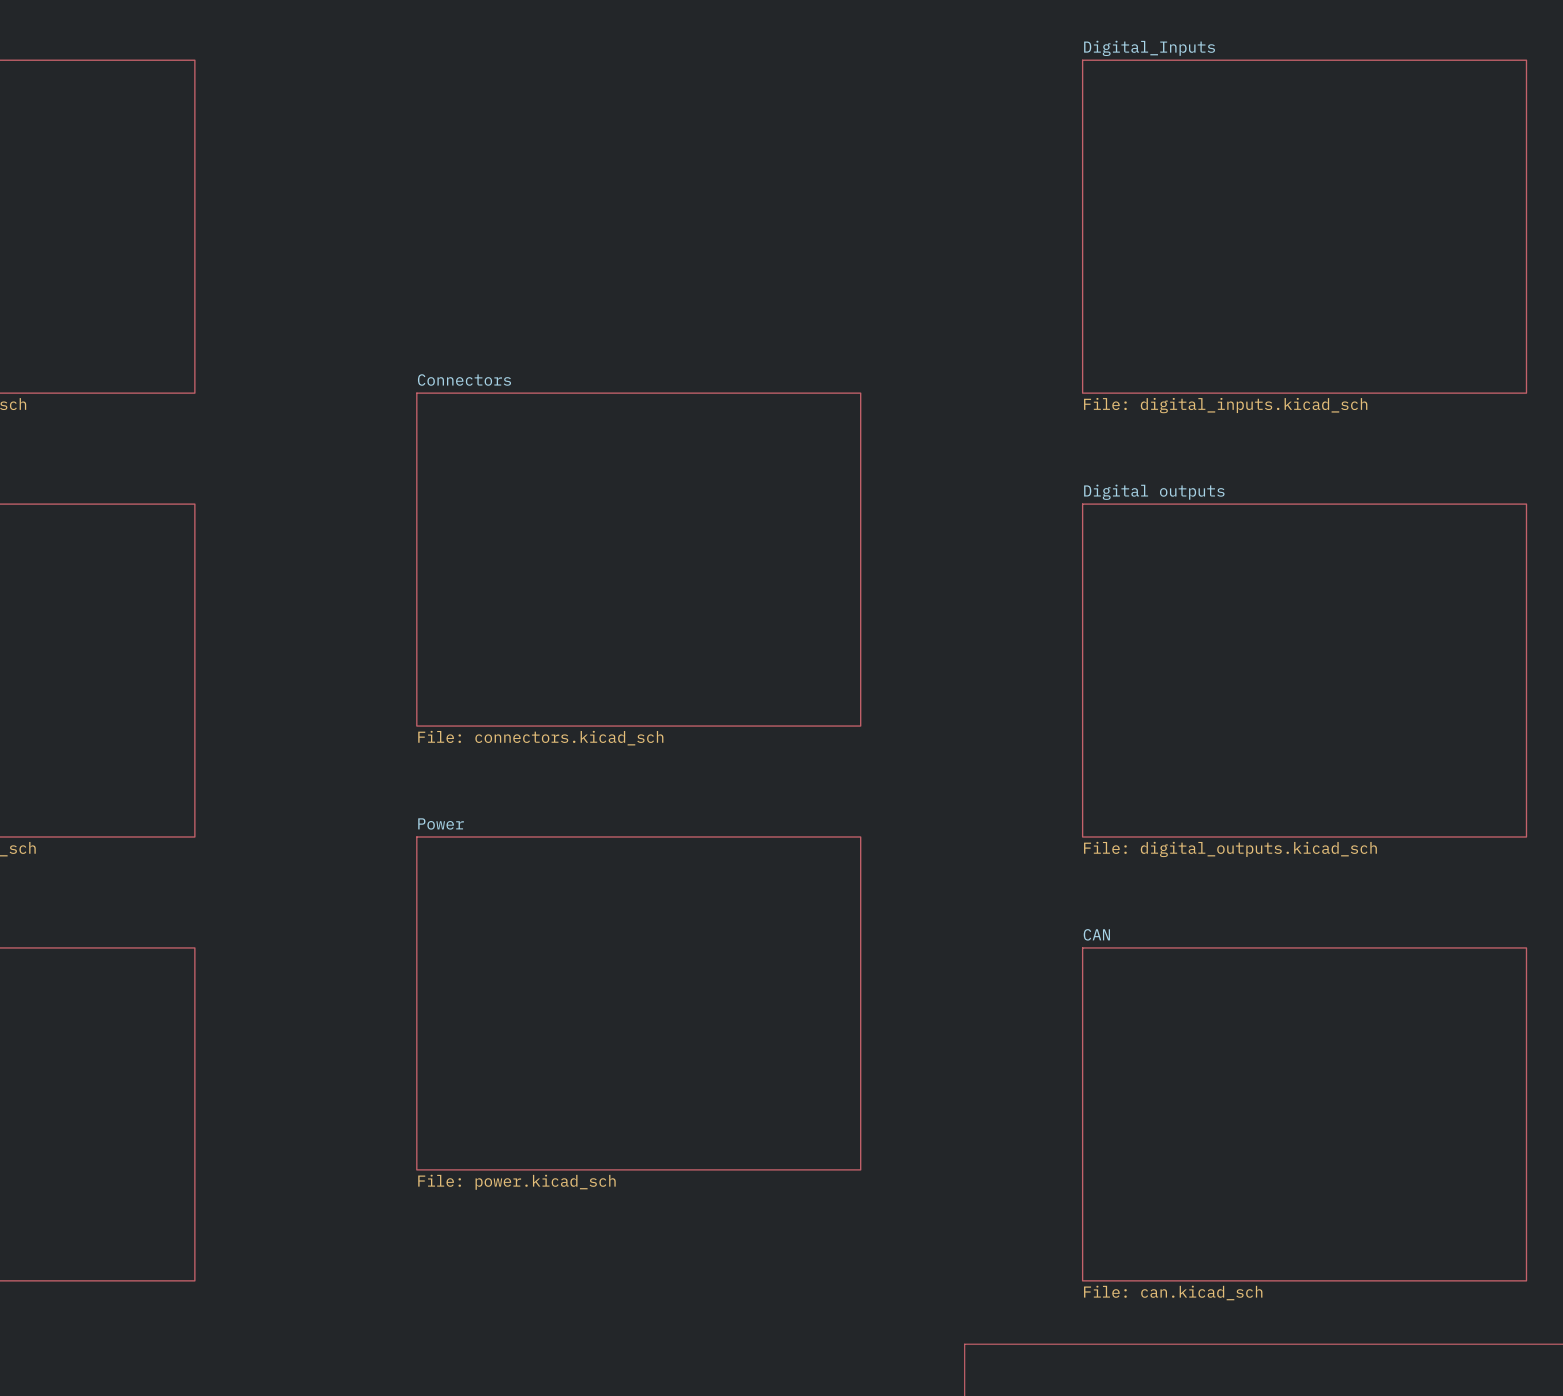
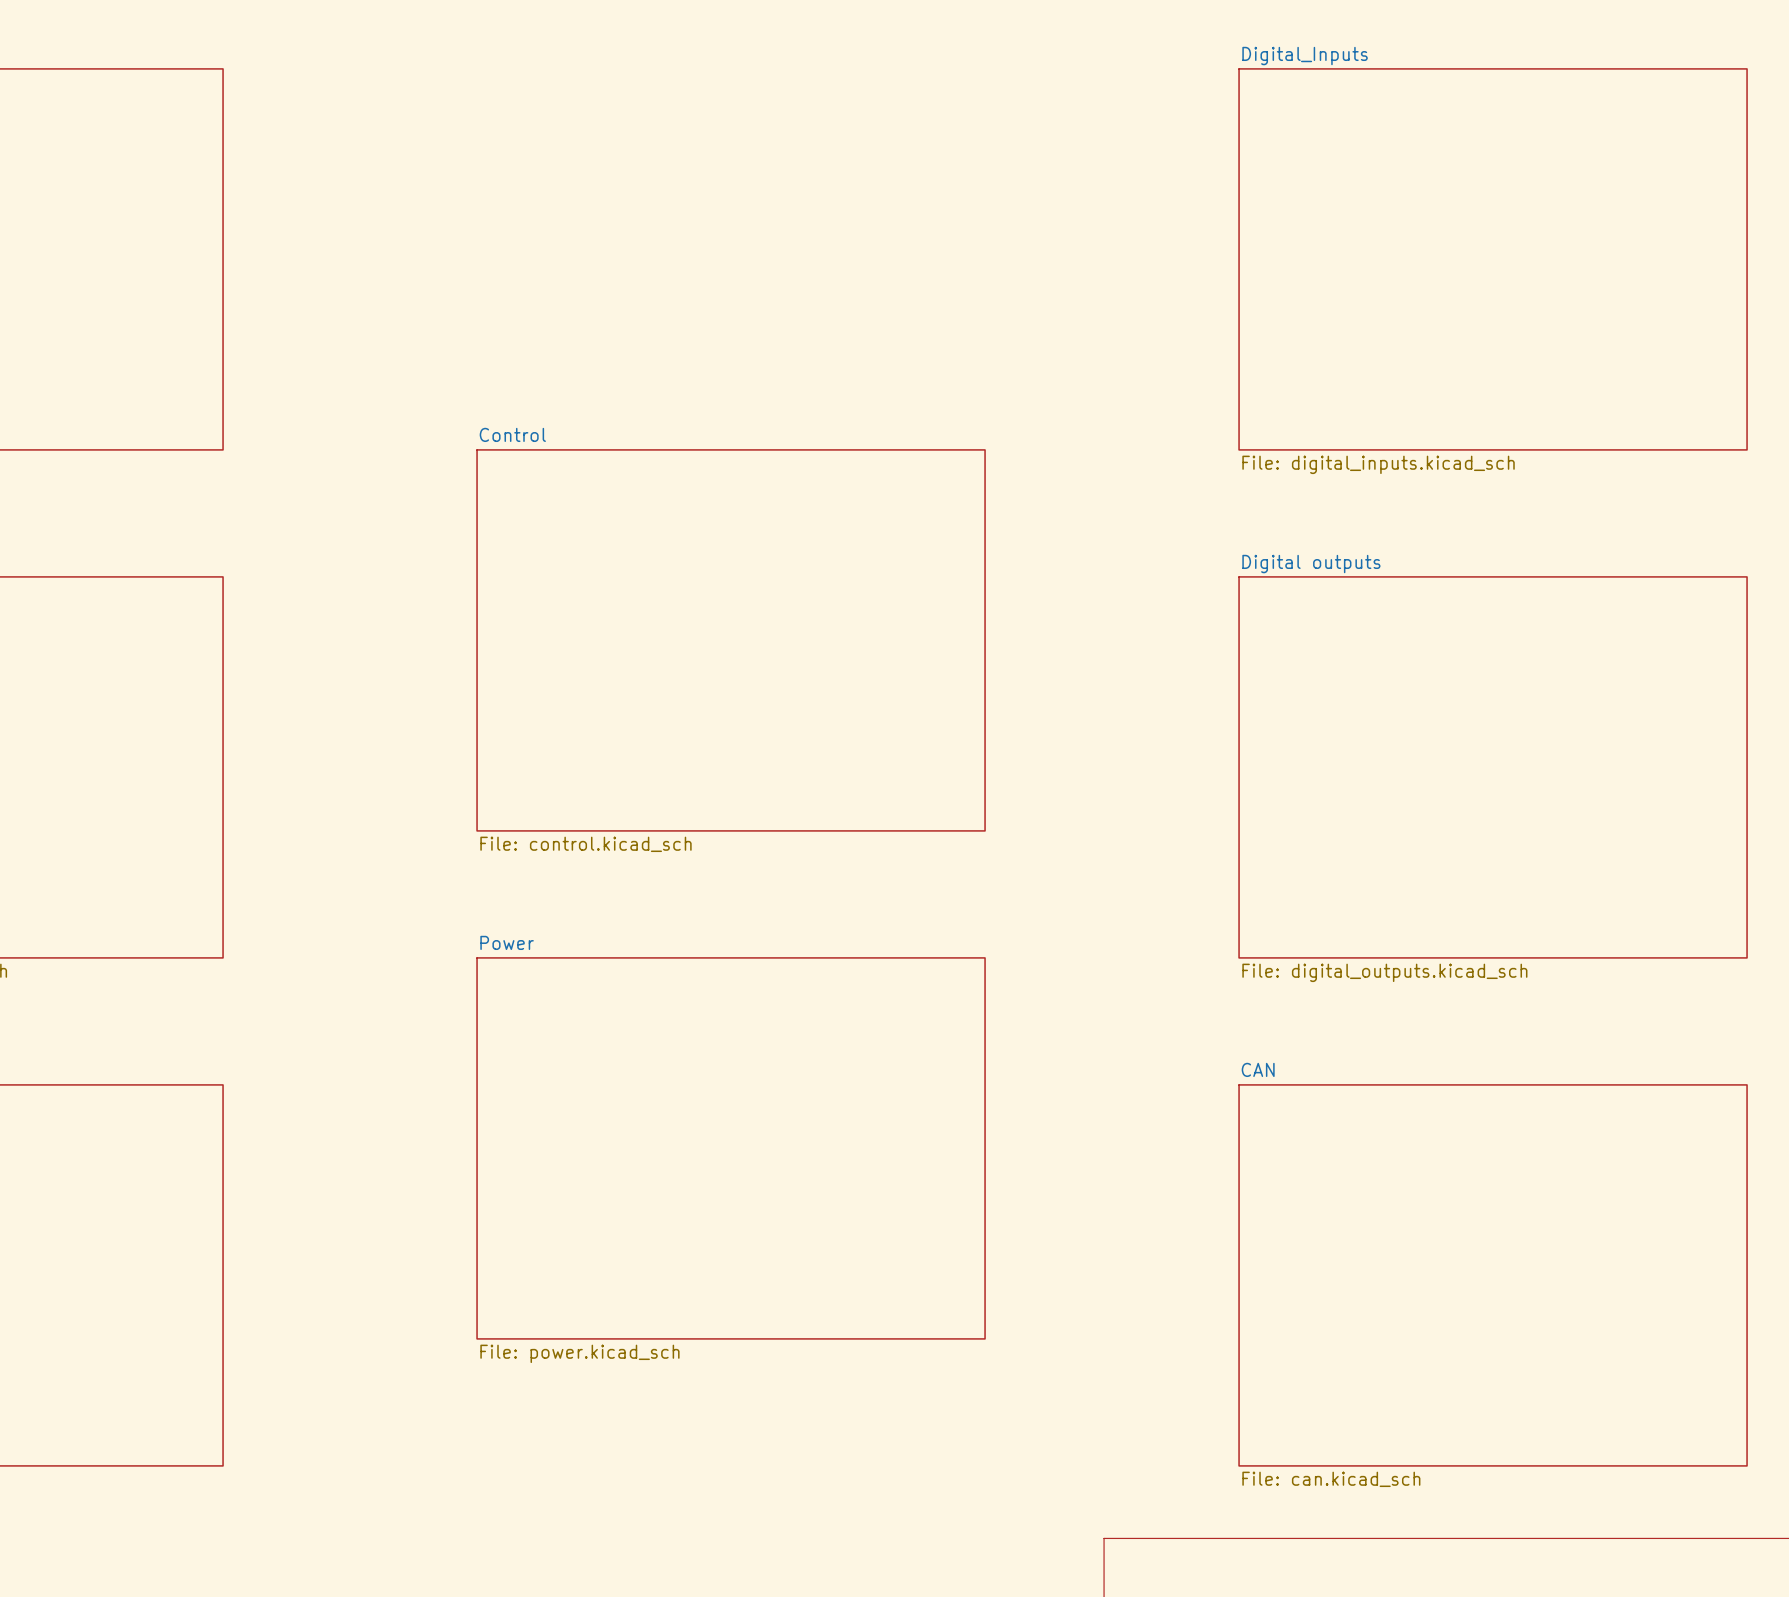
sheet Connectors name: Connectors (464, 380) -> Control (512, 434)
sheet Connectors value: File: connectors.kicad_sch (540, 738) -> File: control.kicad_sch (585, 844)

